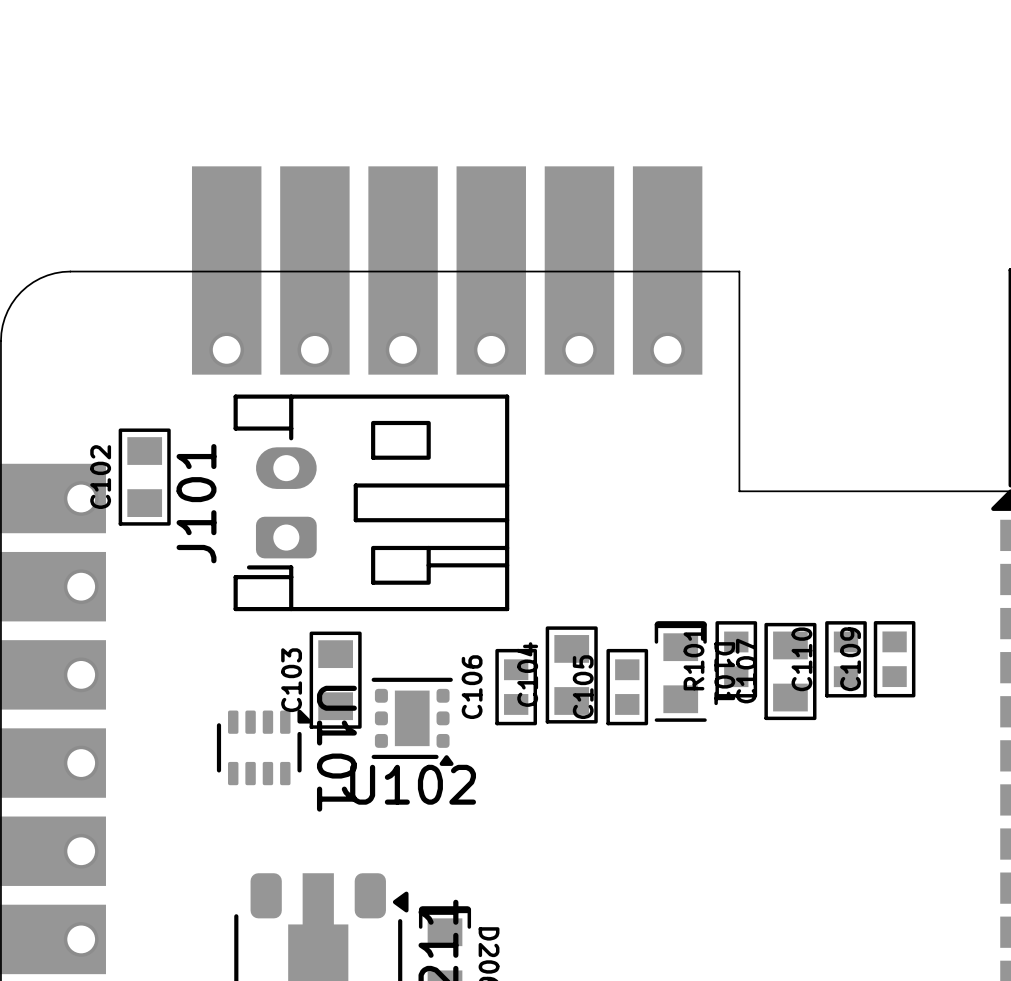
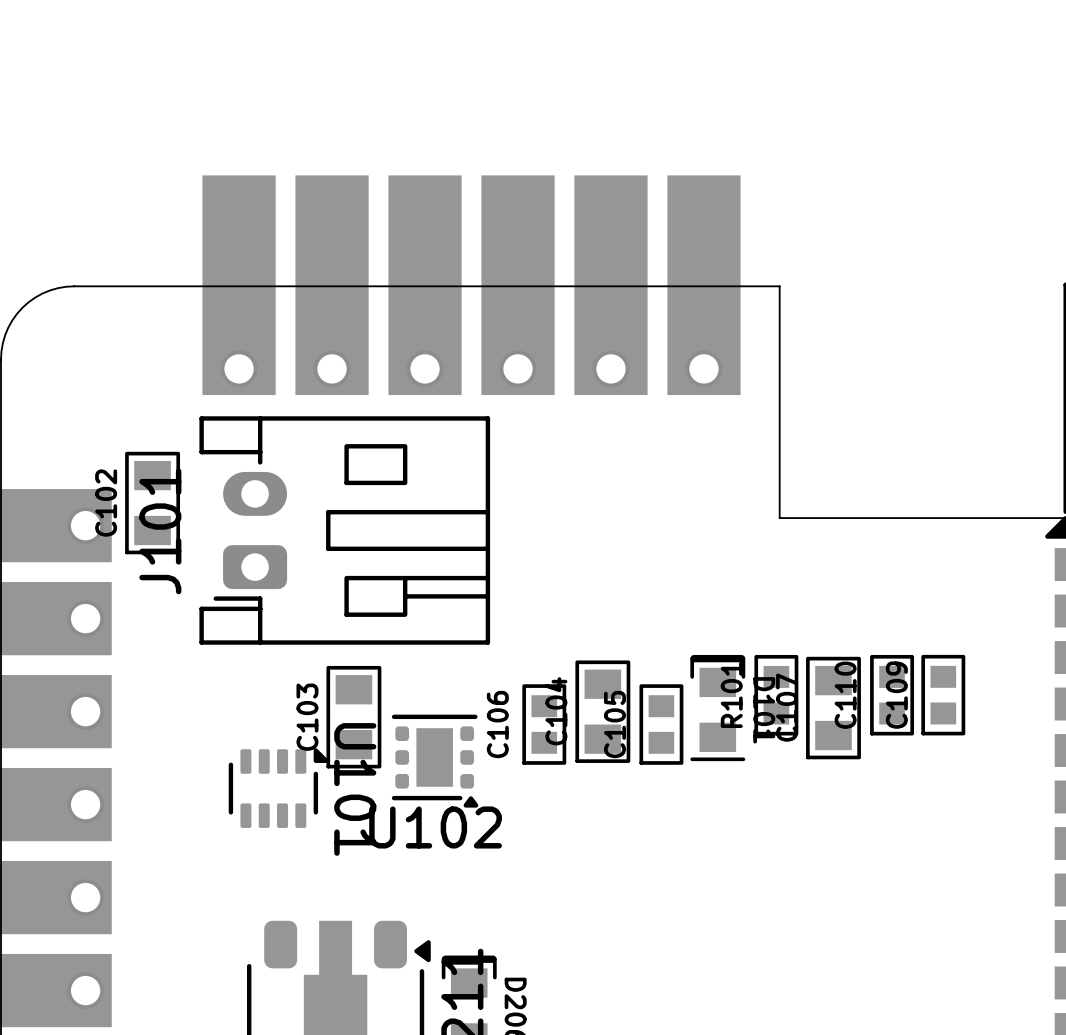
J101 position: (371, 502) -> (344, 530)

